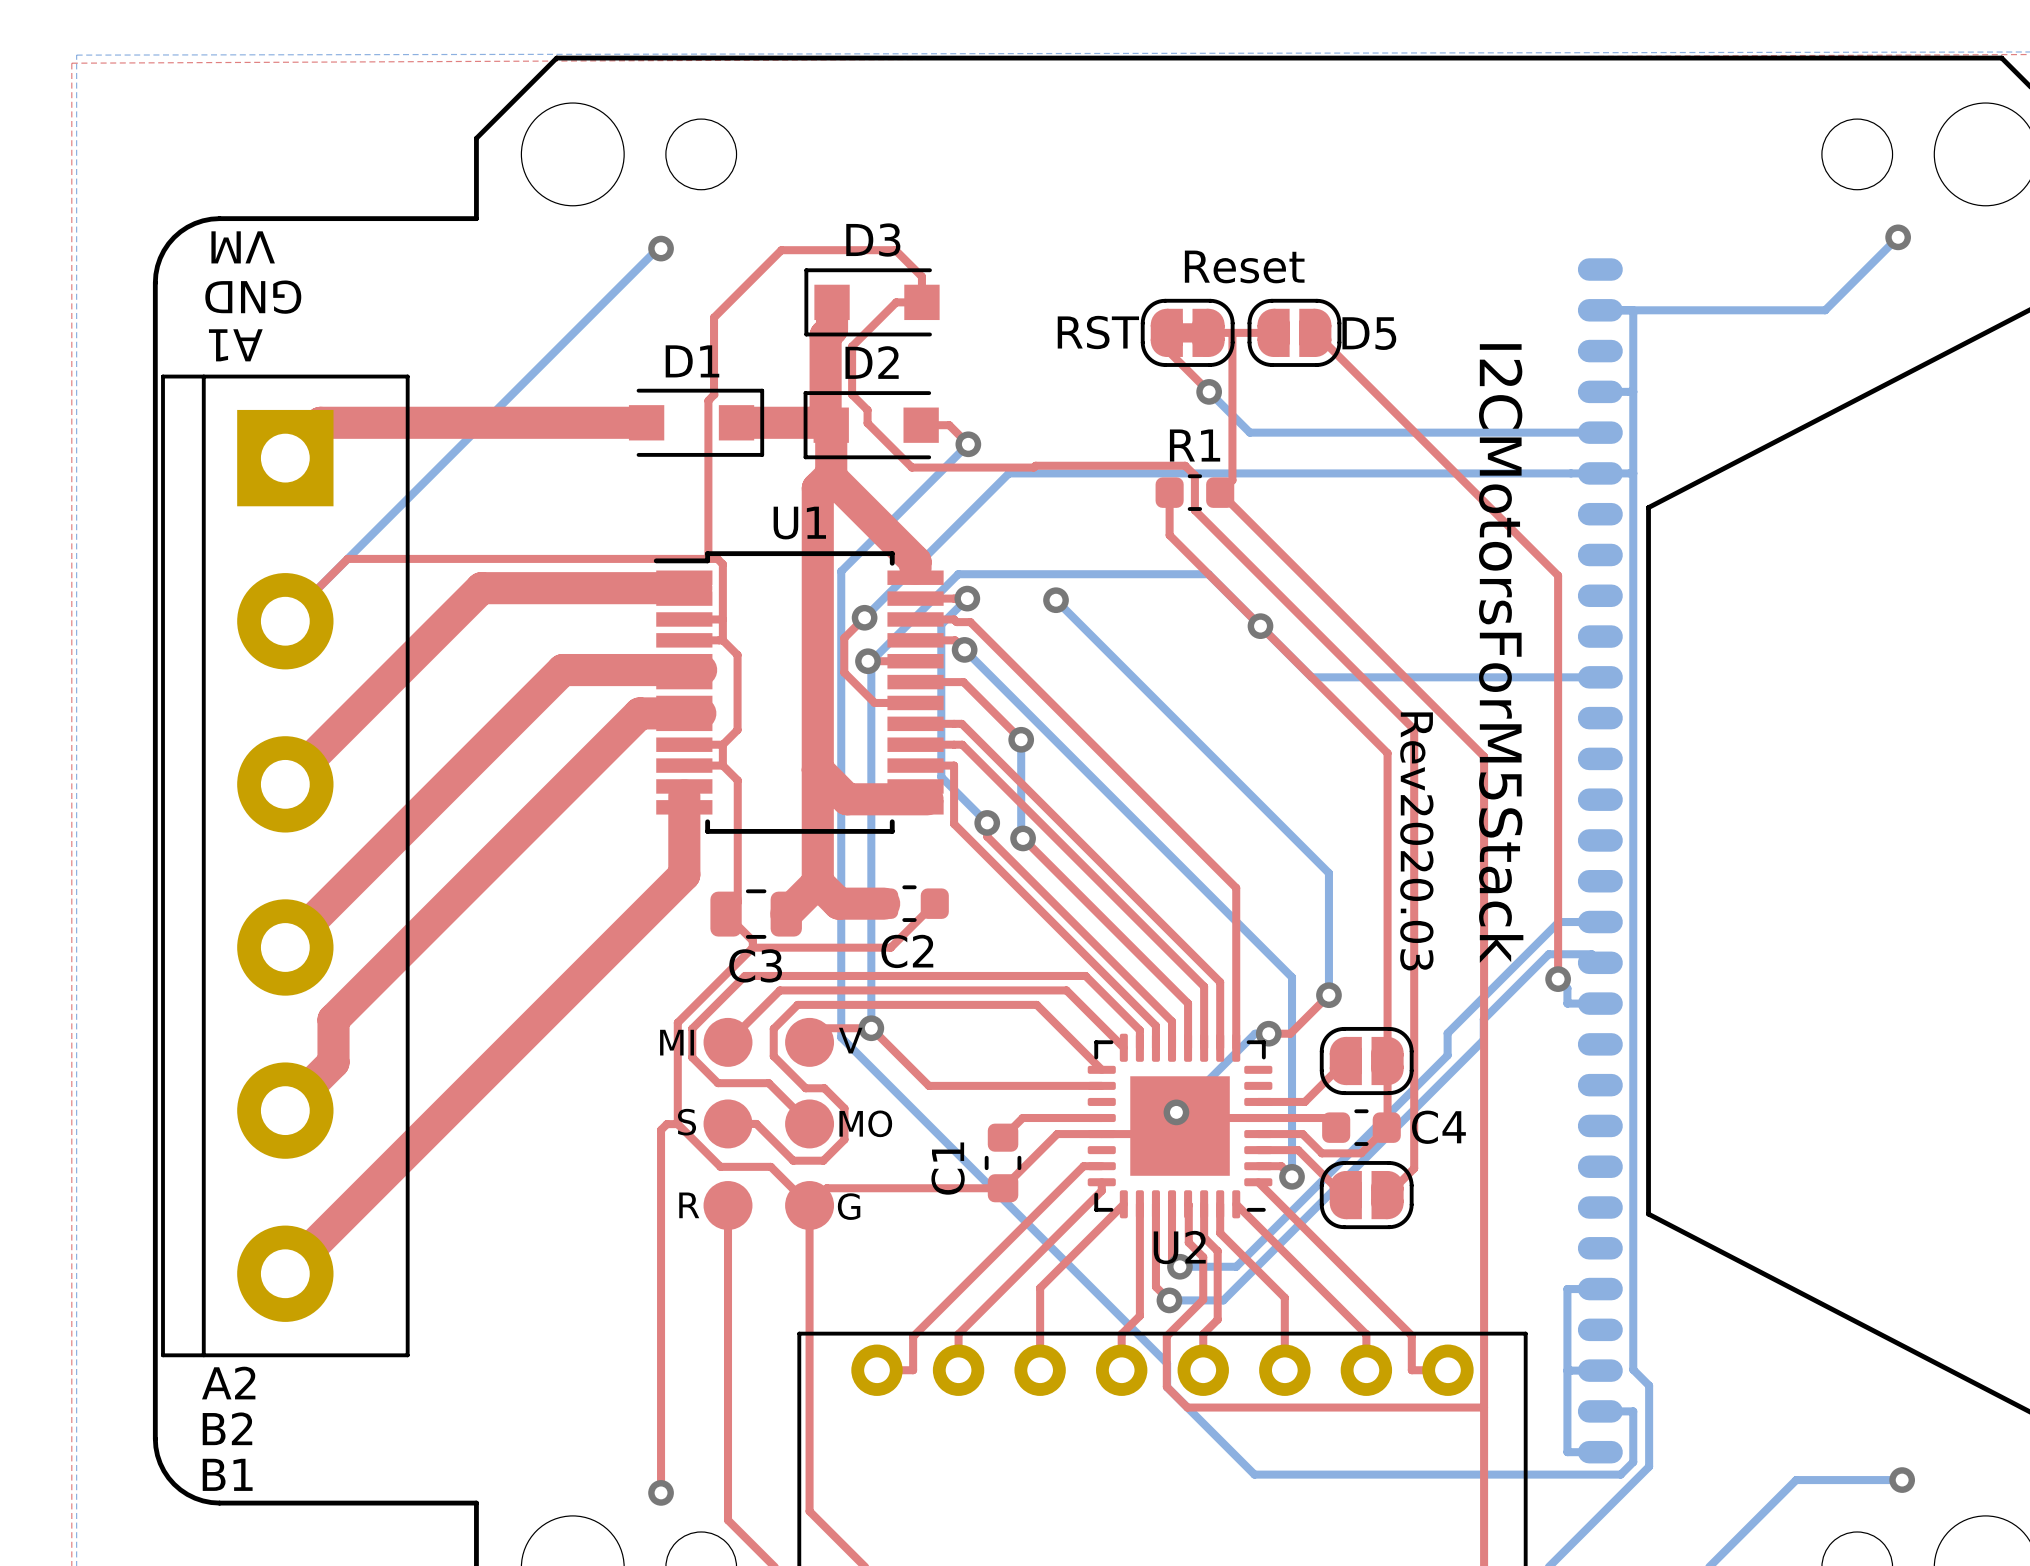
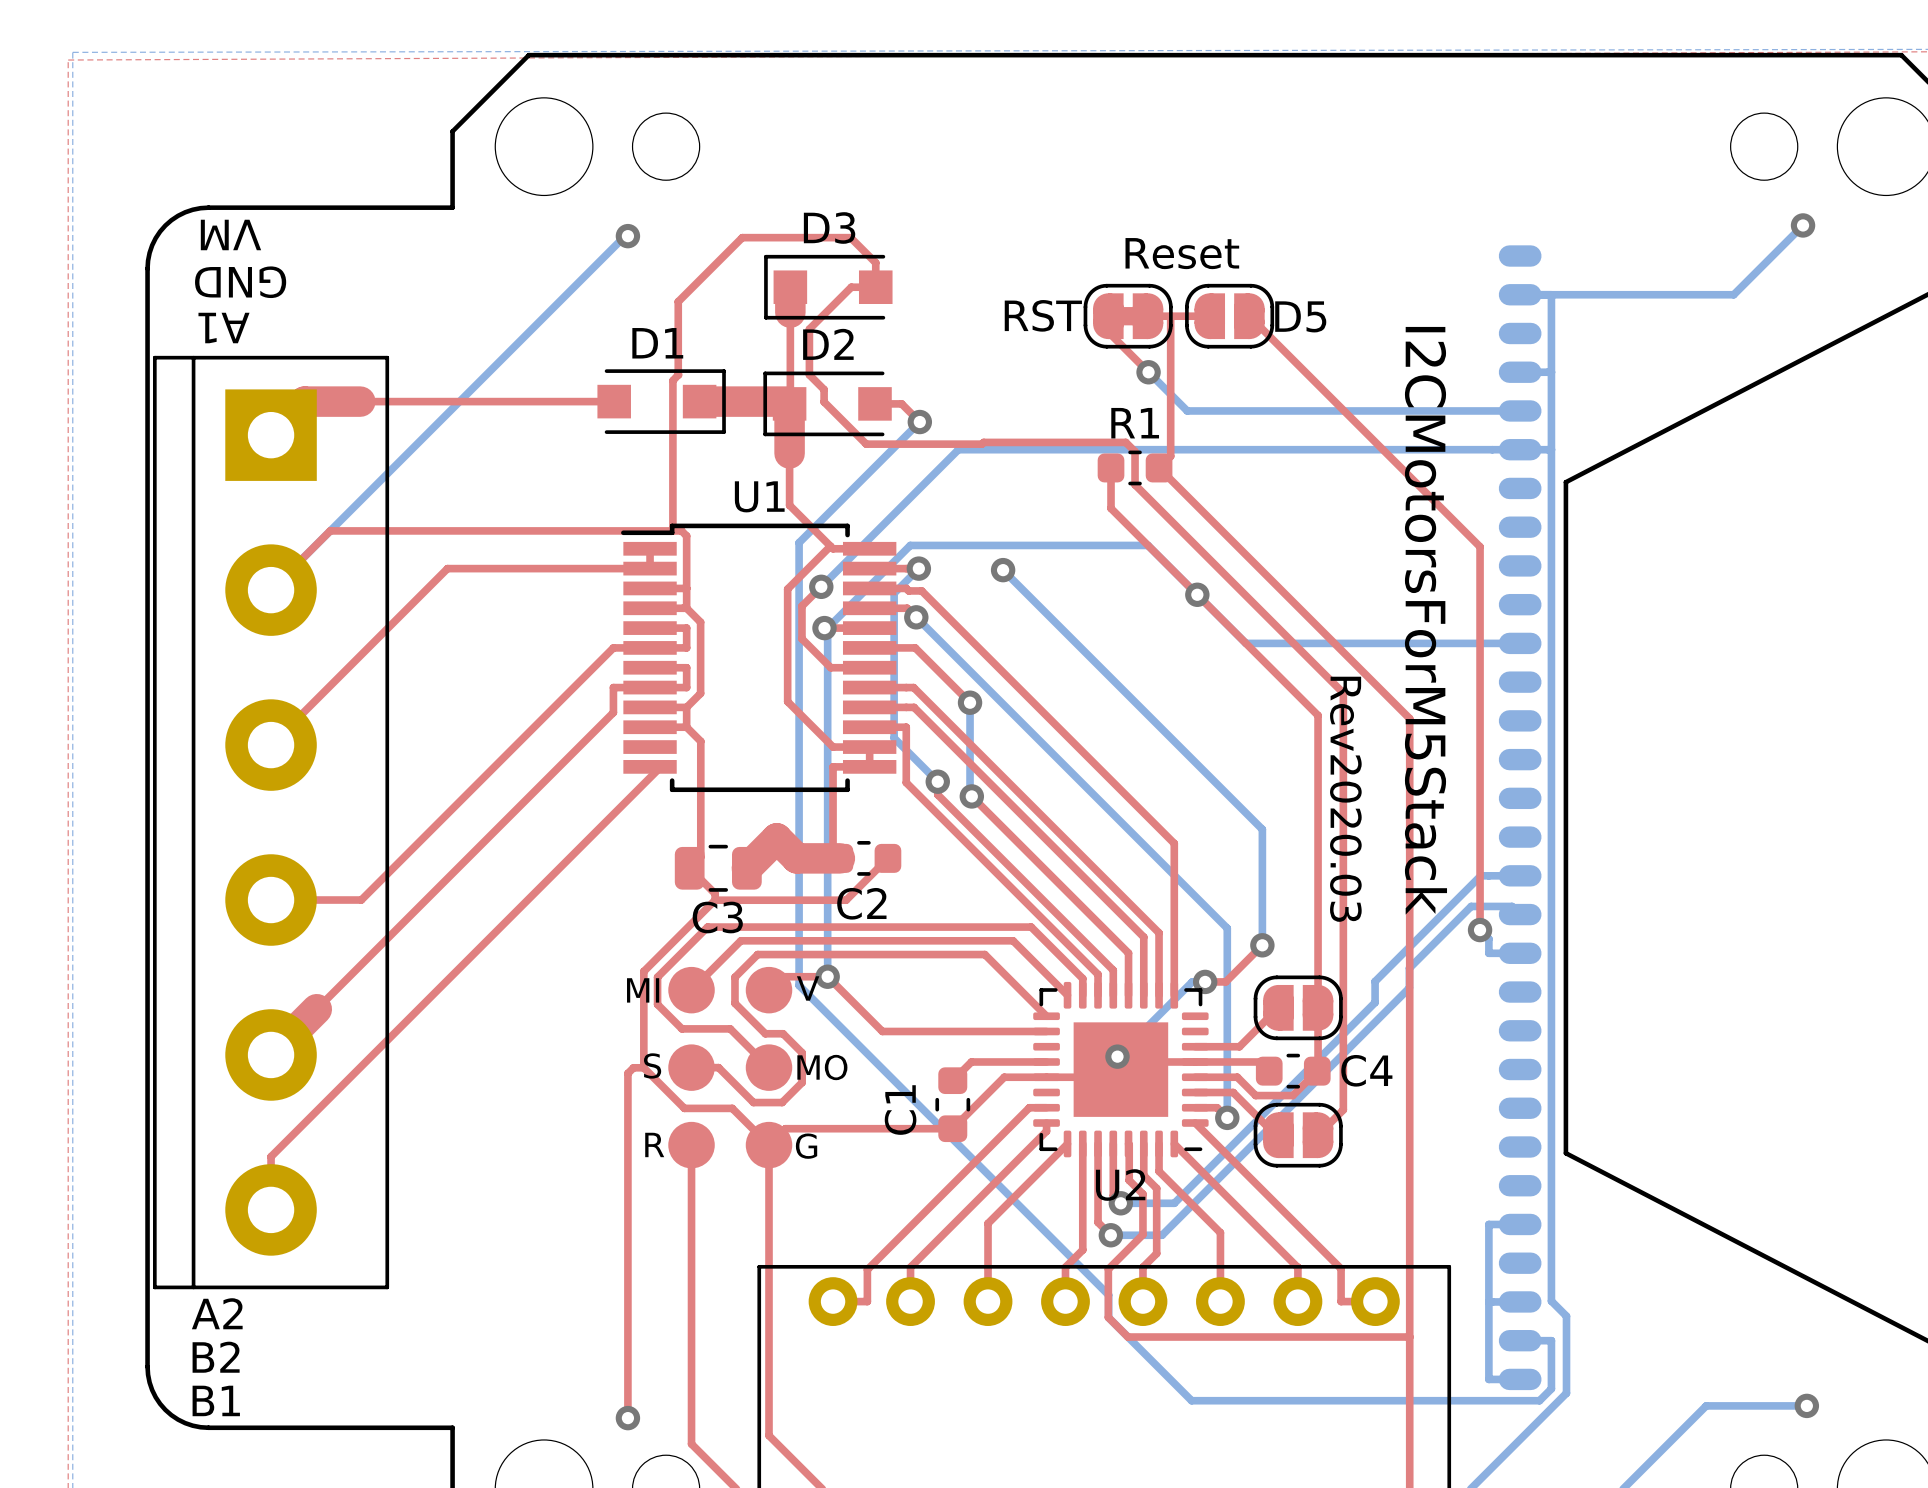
top track: (832, 329) (825, 335) (825, 419) (831, 425) -> (790, 312) (790, 403) (762, 403) (760, 401)
top track width: thick (379, 422) (646, 422) -> thin (360, 401) (614, 401)
top track: (831, 474) (817, 488) (817, 882) -> none
top track: (831, 477) (915, 561) (915, 568) -> (789, 453) (789, 505) (833, 548) (869, 548)
top track: none -> (830, 546) (787, 589) (787, 701) (833, 747) (869, 747)
top track: (696, 588) (481, 588) (471, 598) -> (650, 568) (447, 568)
top track width: thick (471, 598) (285, 784) -> thin (447, 568) (271, 745)
top track: (701, 670) (562, 670) (285, 947) -> (650, 628) (686, 628) (686, 647) (613, 647) (361, 900) (271, 900)
top track: (700, 713) (639, 713) (333, 1019) (333, 1062) -> (650, 667) (686, 667) (686, 687) (613, 687) (613, 712) (316, 1009)
top track: (817, 769) (847, 799) (927, 799) -> none
top track: (684, 795) (684, 874) (285, 1273) -> (660, 766) (271, 1156) (271, 1209)
top track: none -> (869, 766) (833, 766) (833, 851)

